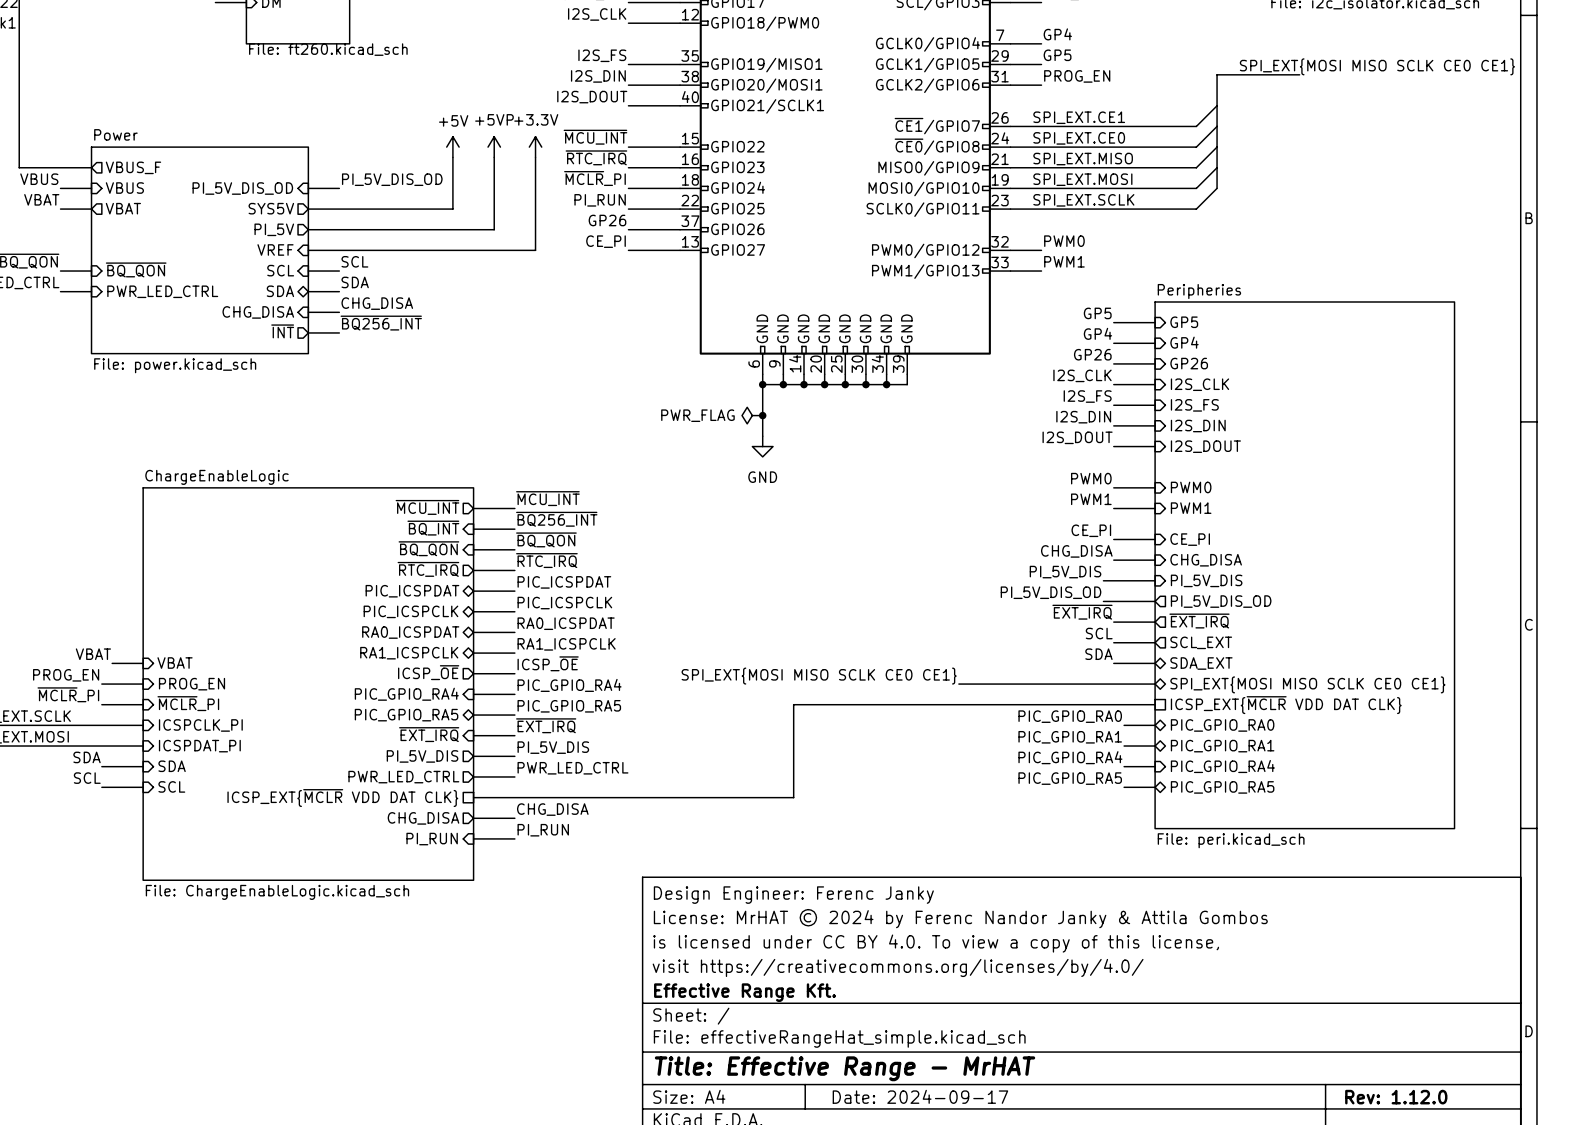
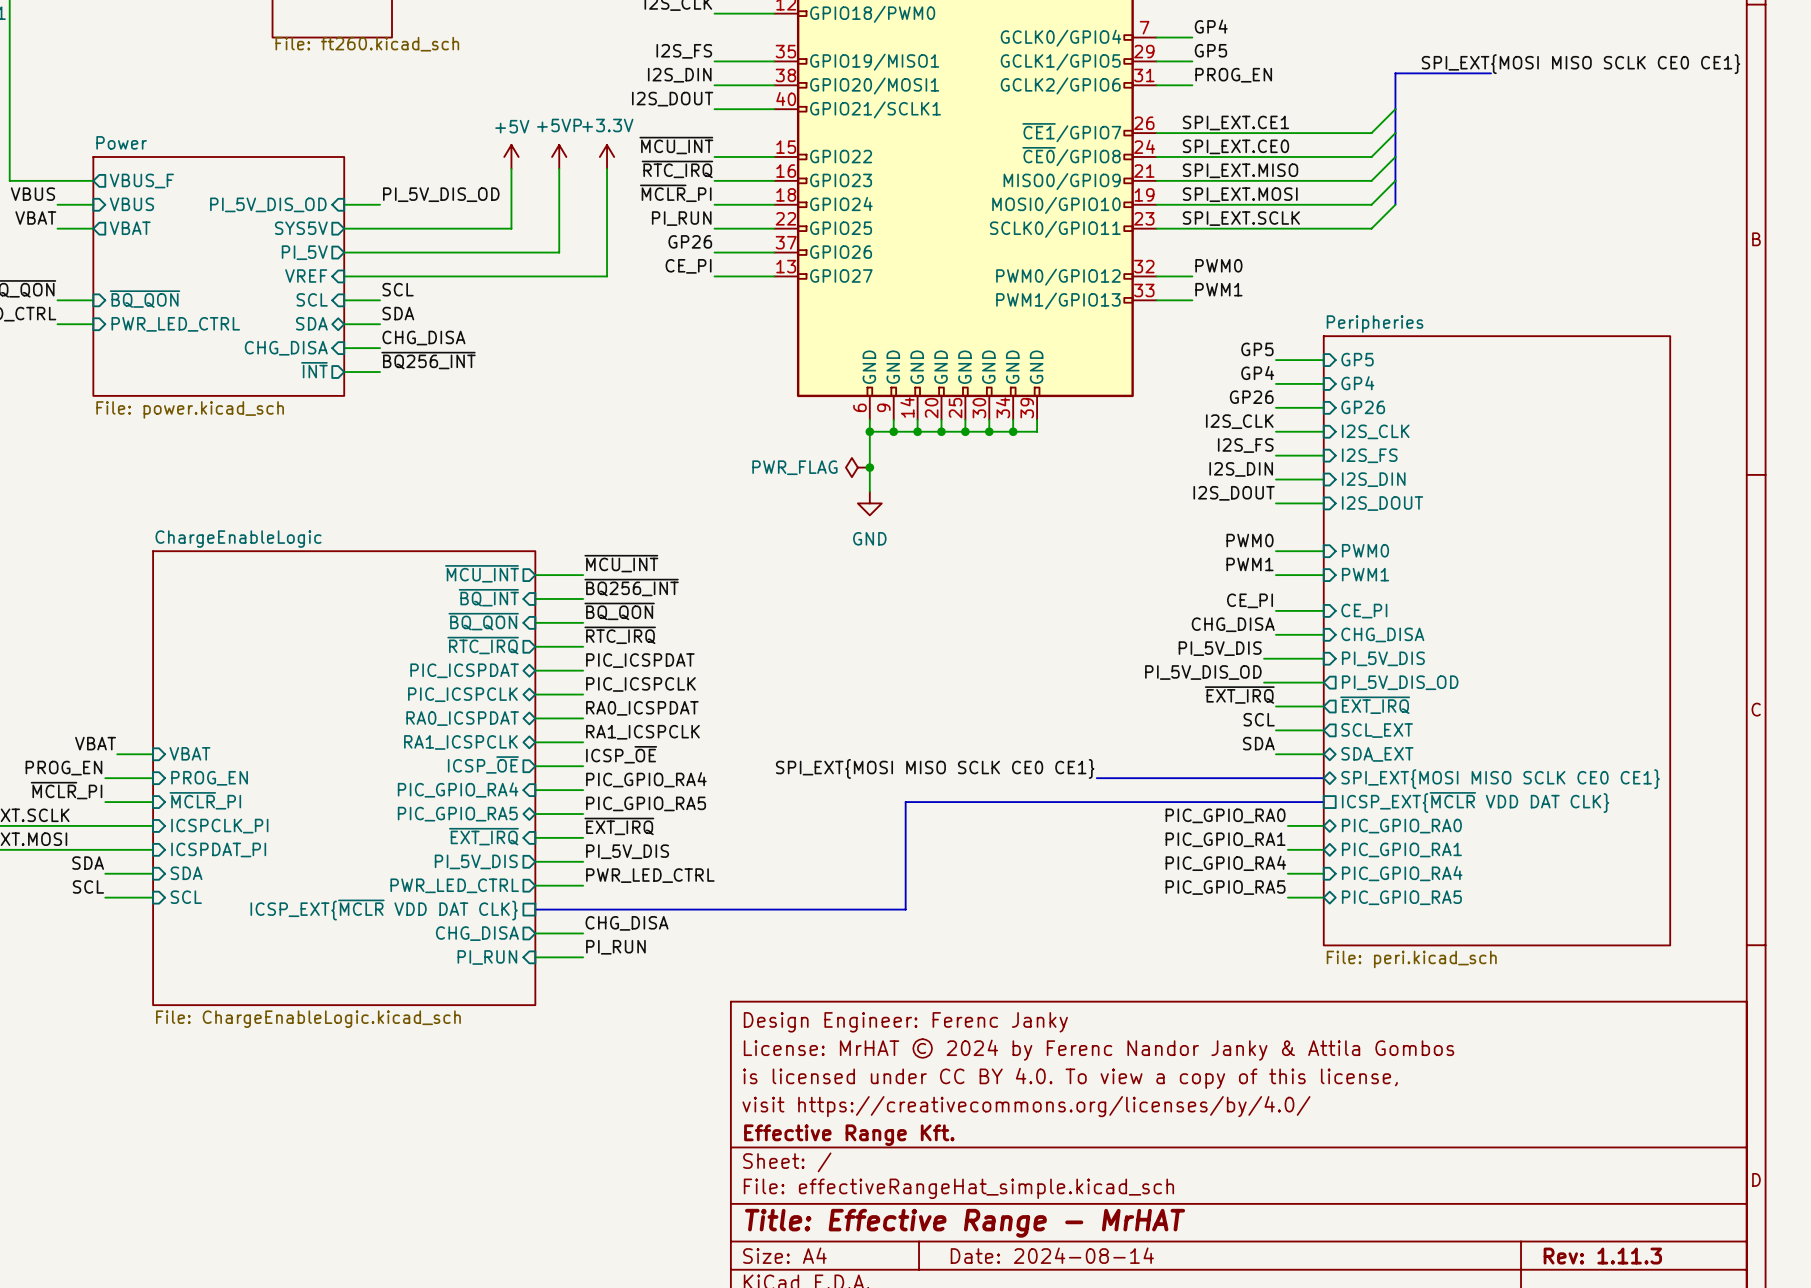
title block: Date: 2024-09-17 (920, 1096) -> Date: 2024-08-14 (1052, 1255)
title block: Rev: 1.12.0 (1396, 1097) -> Rev: 1.11.3 (1602, 1256)

